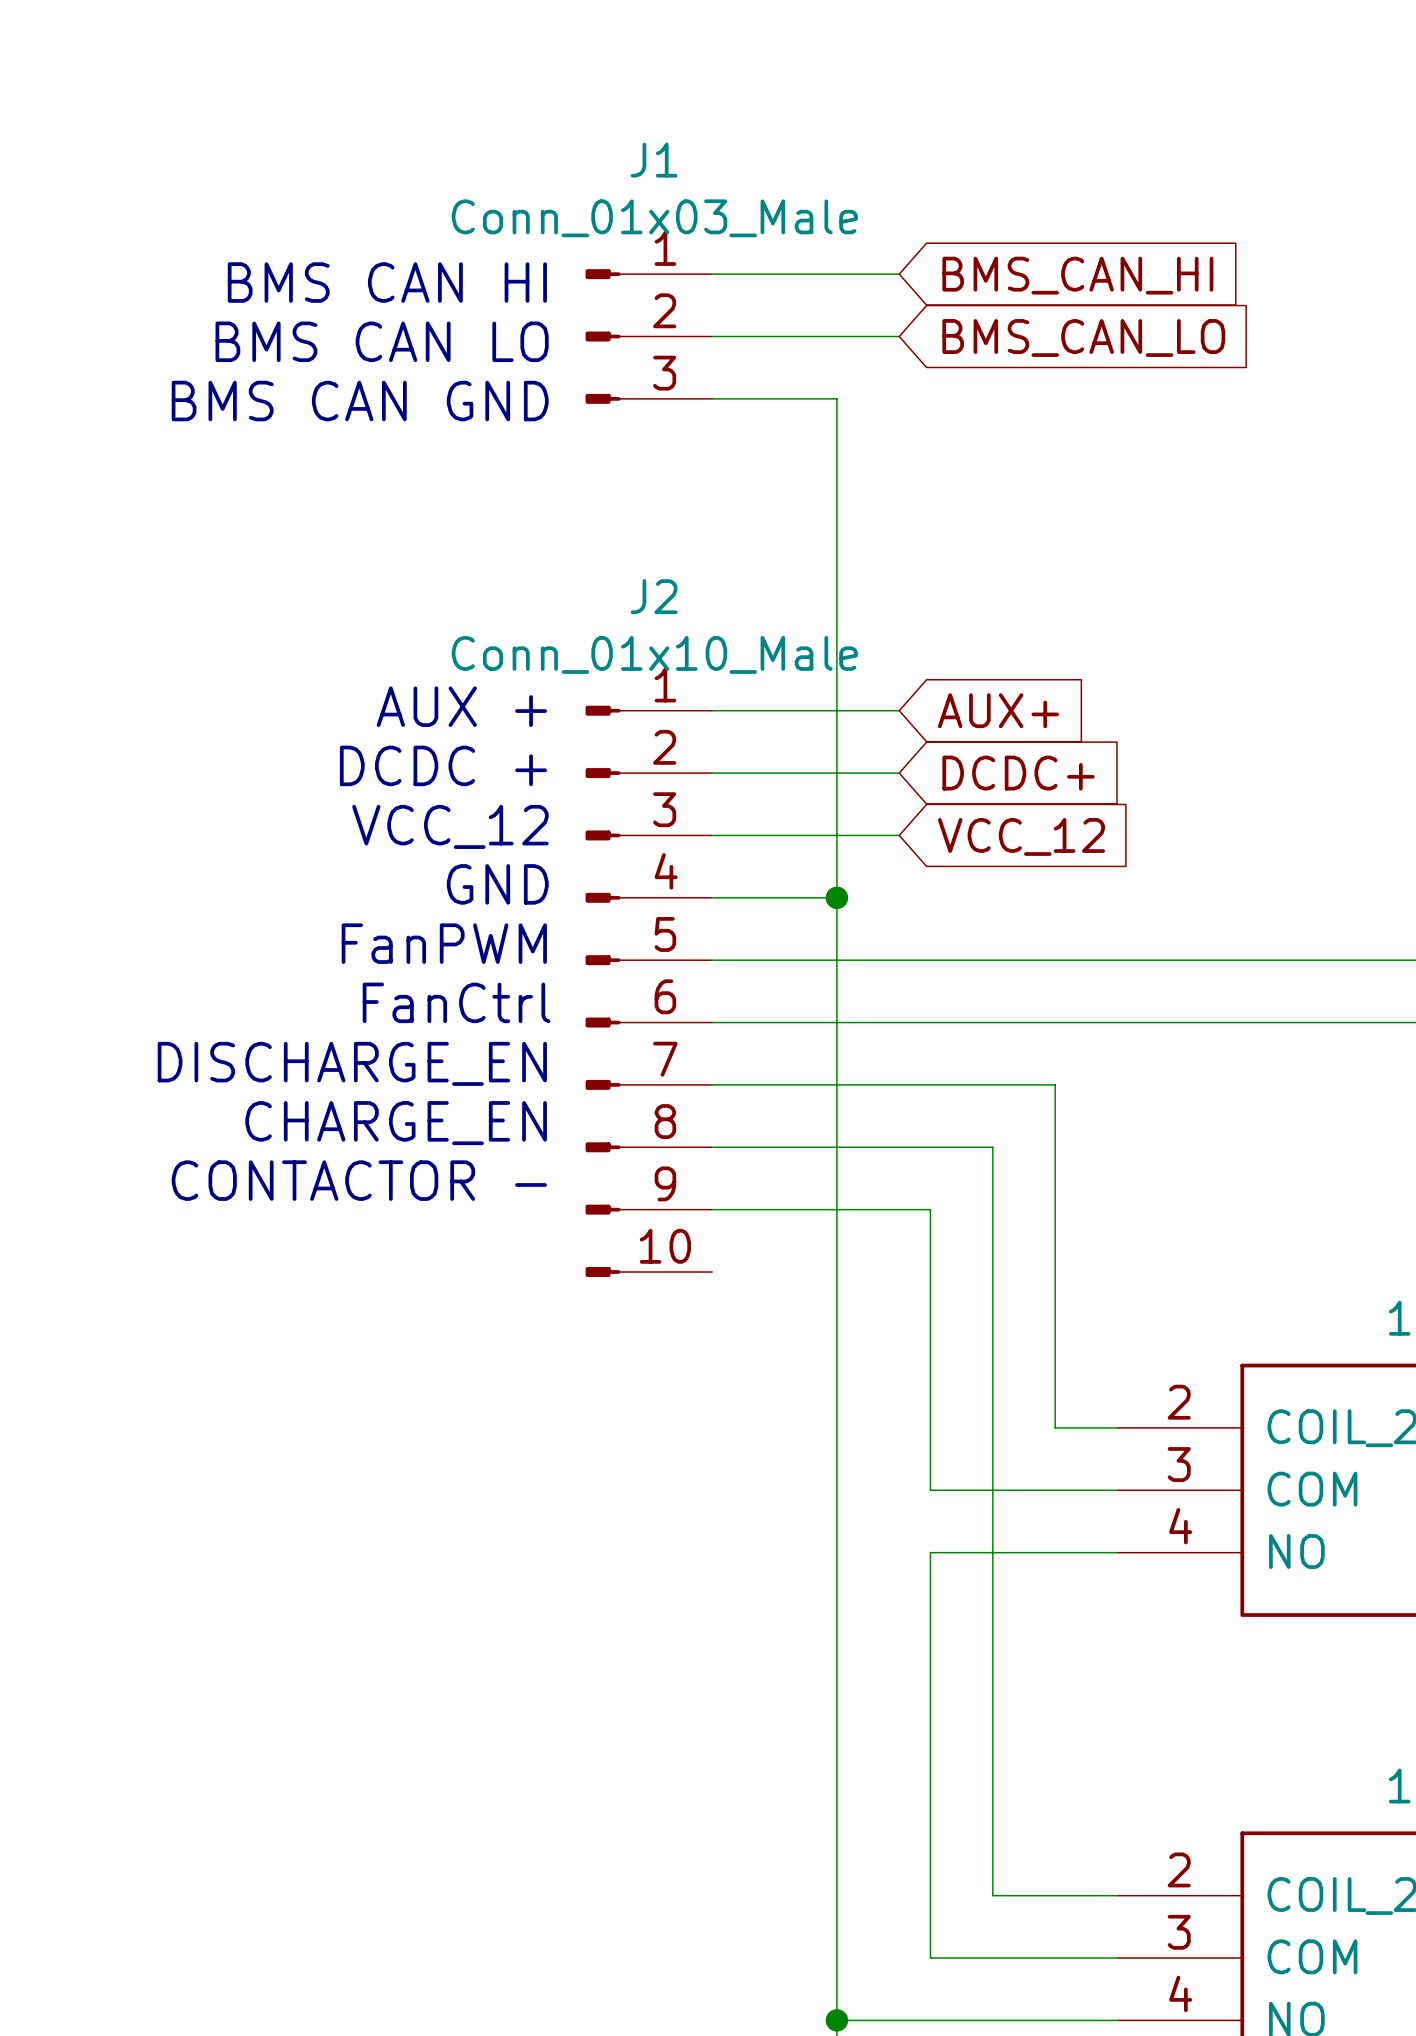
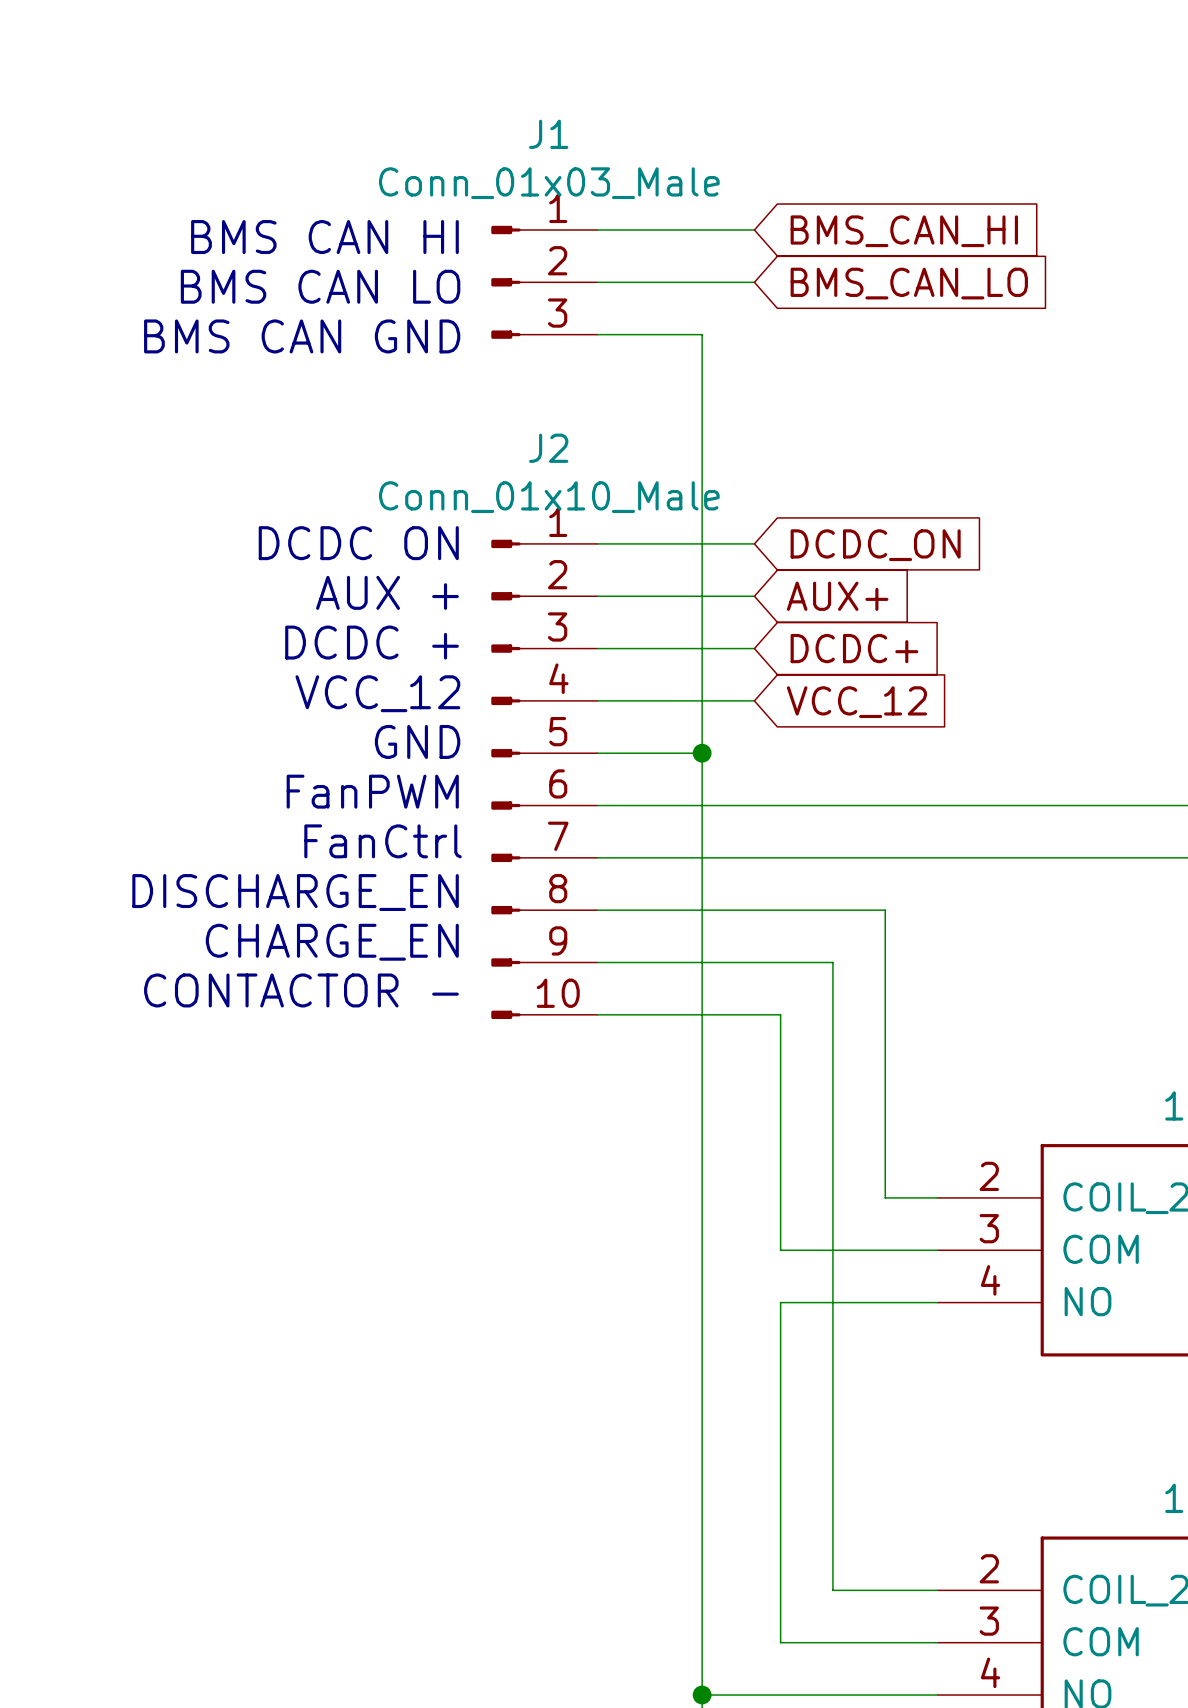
text: none -> DCDC ON (358, 543)
wire: none -> (597, 543) (754, 543)
global label: none -> DCDC_ON (875, 545)
J2 position: (648, 991) -> (544, 779)

